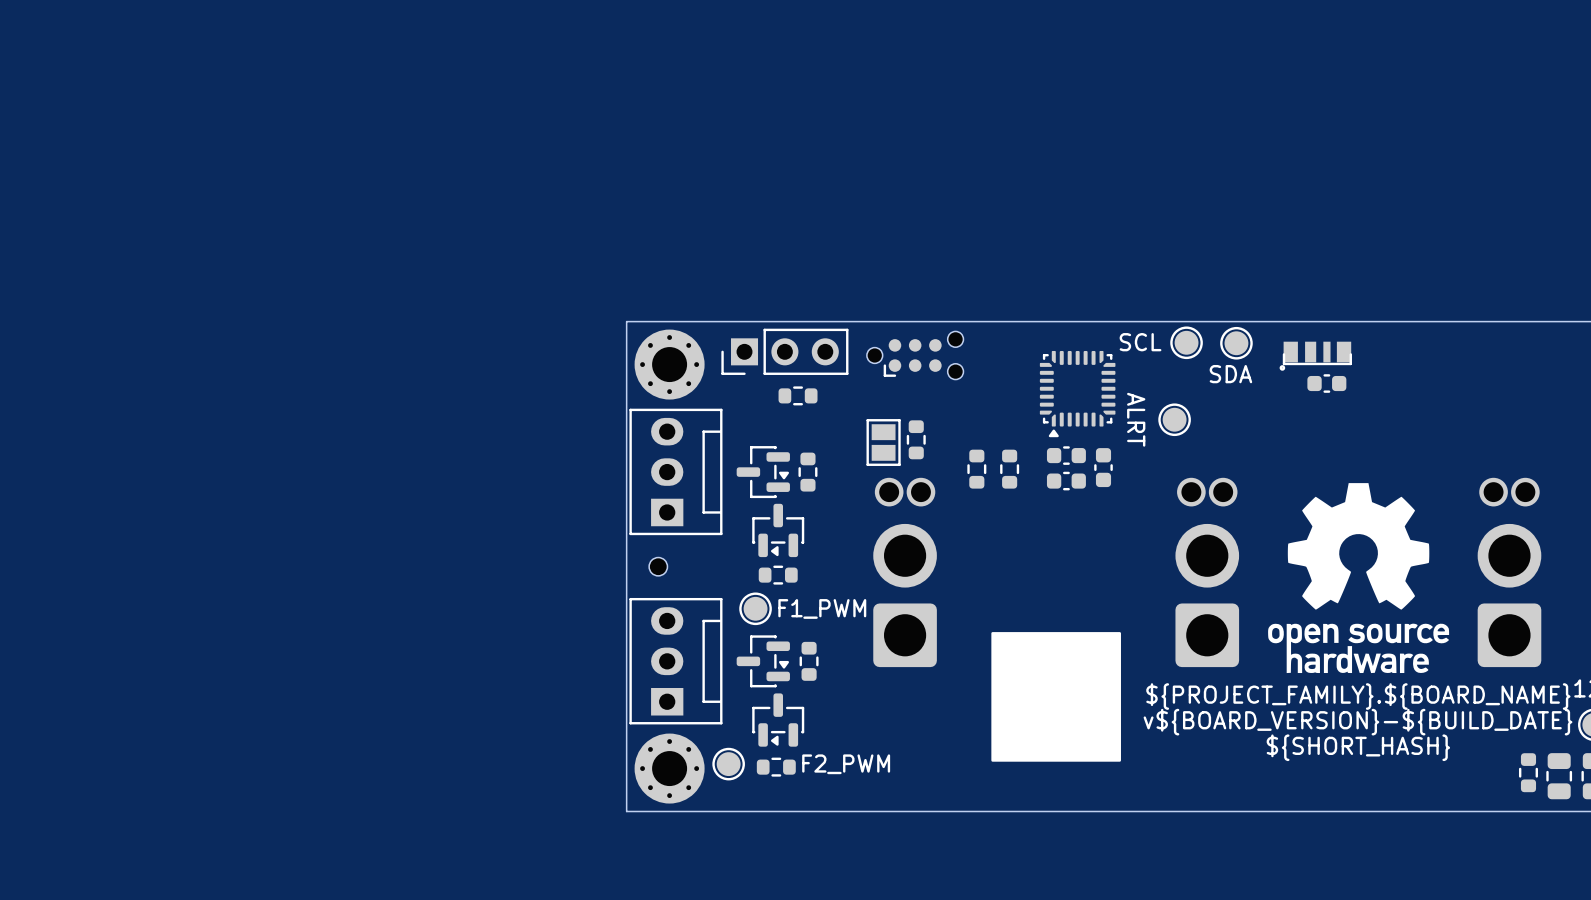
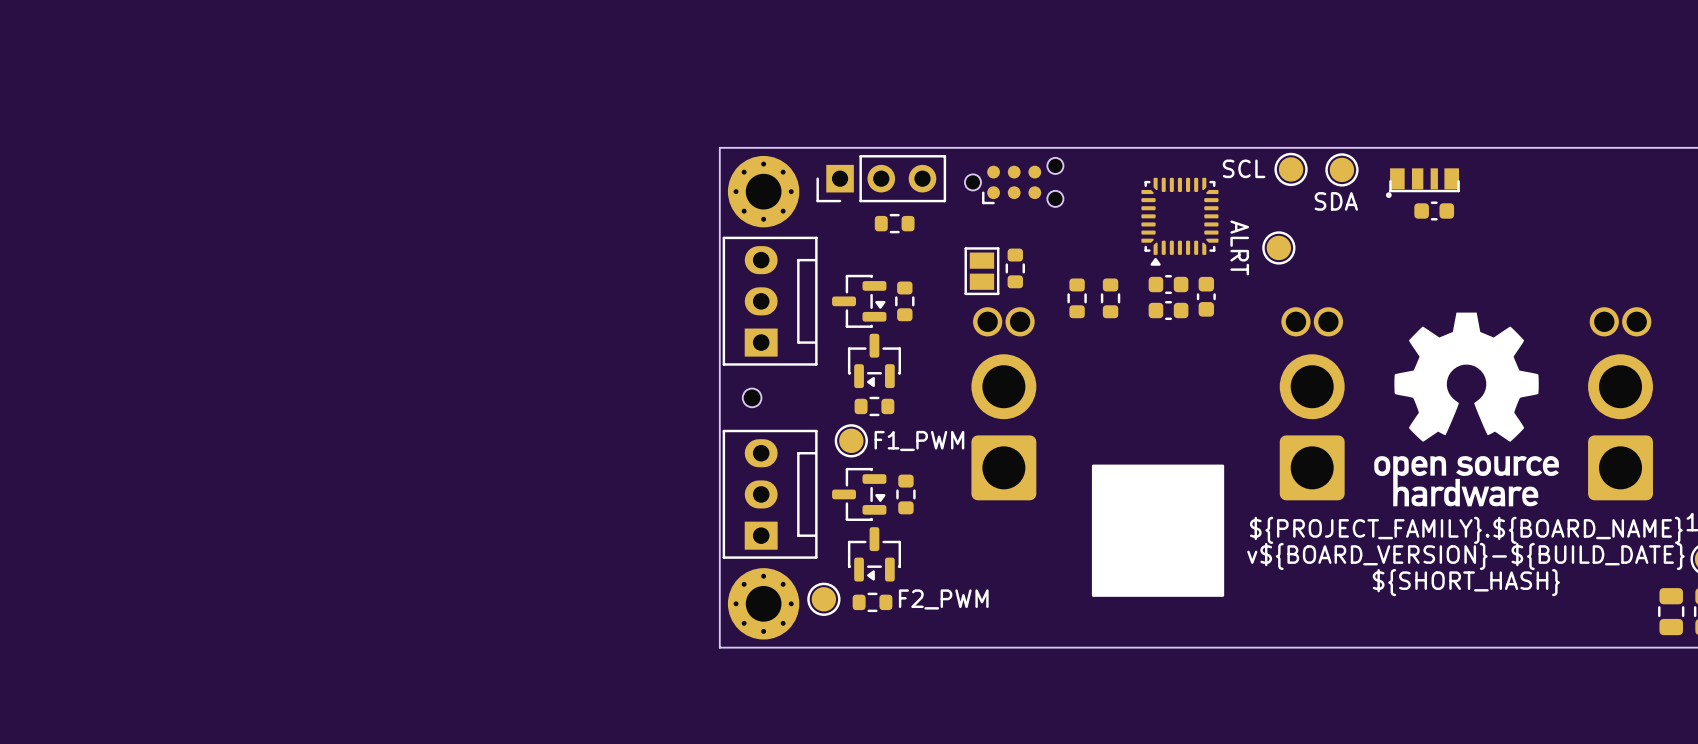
part: (1528, 772) -> none

